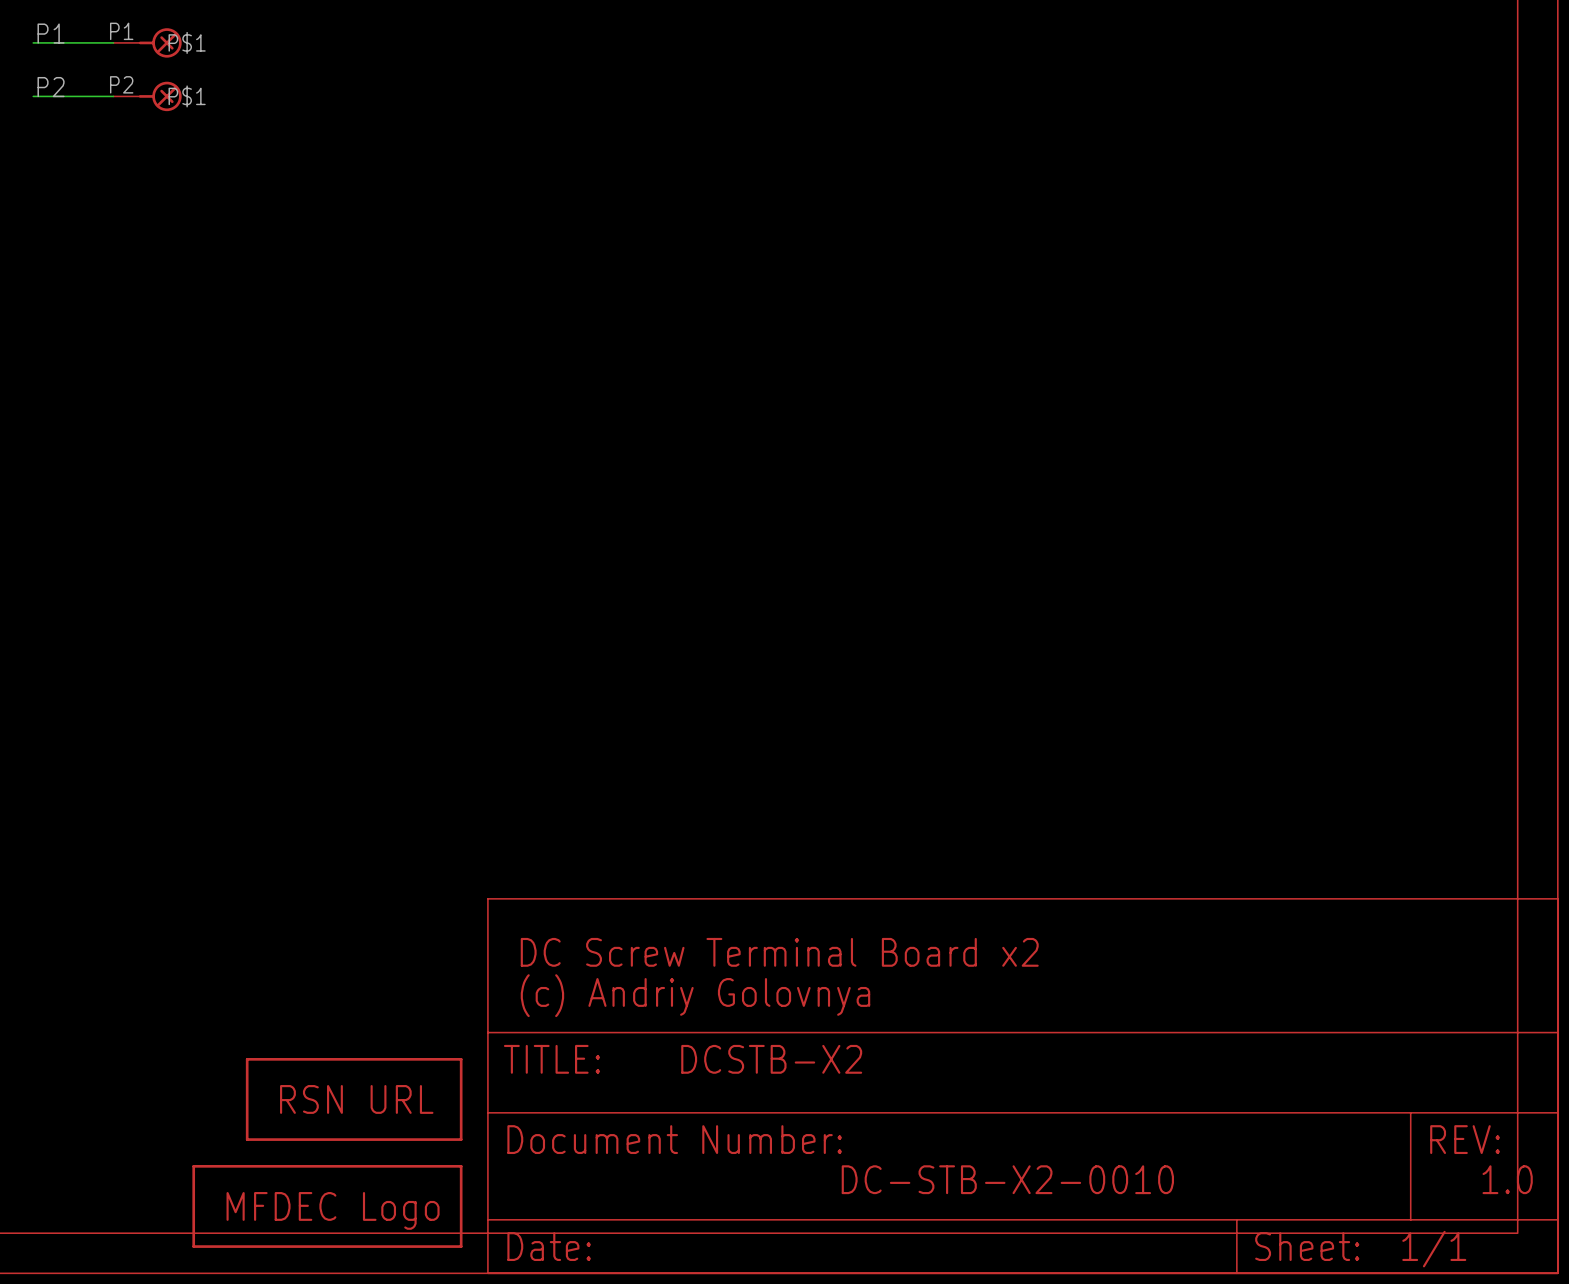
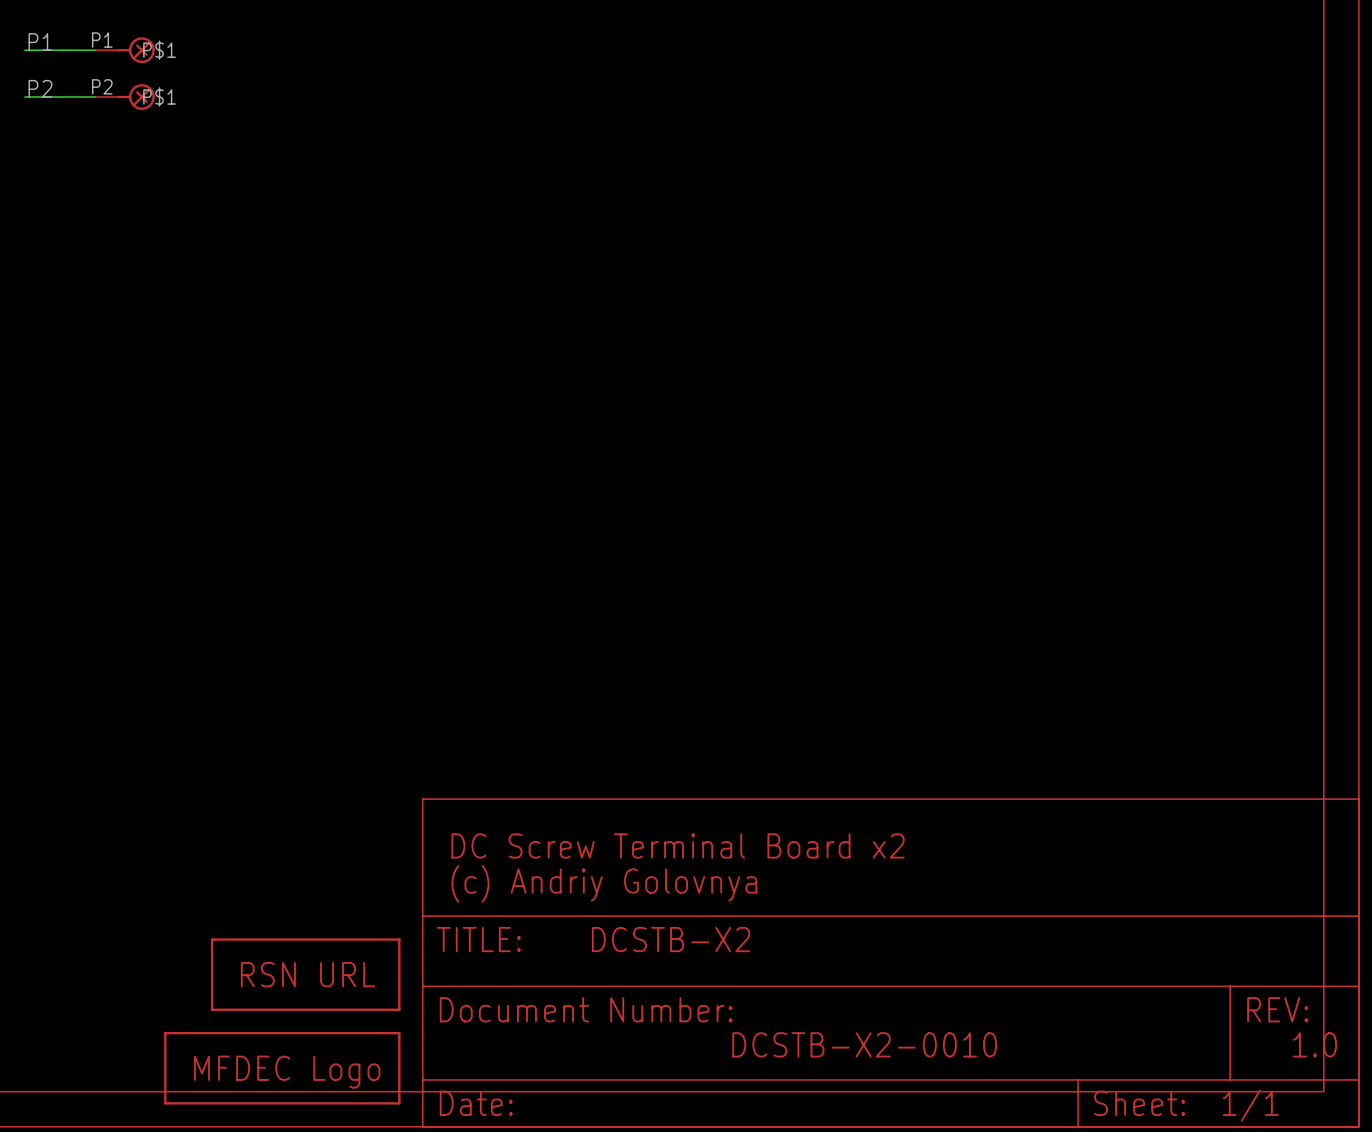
text: DC-STB-X2-0010 (1007, 1179) -> DCSTB-X2-0010 (864, 1044)

